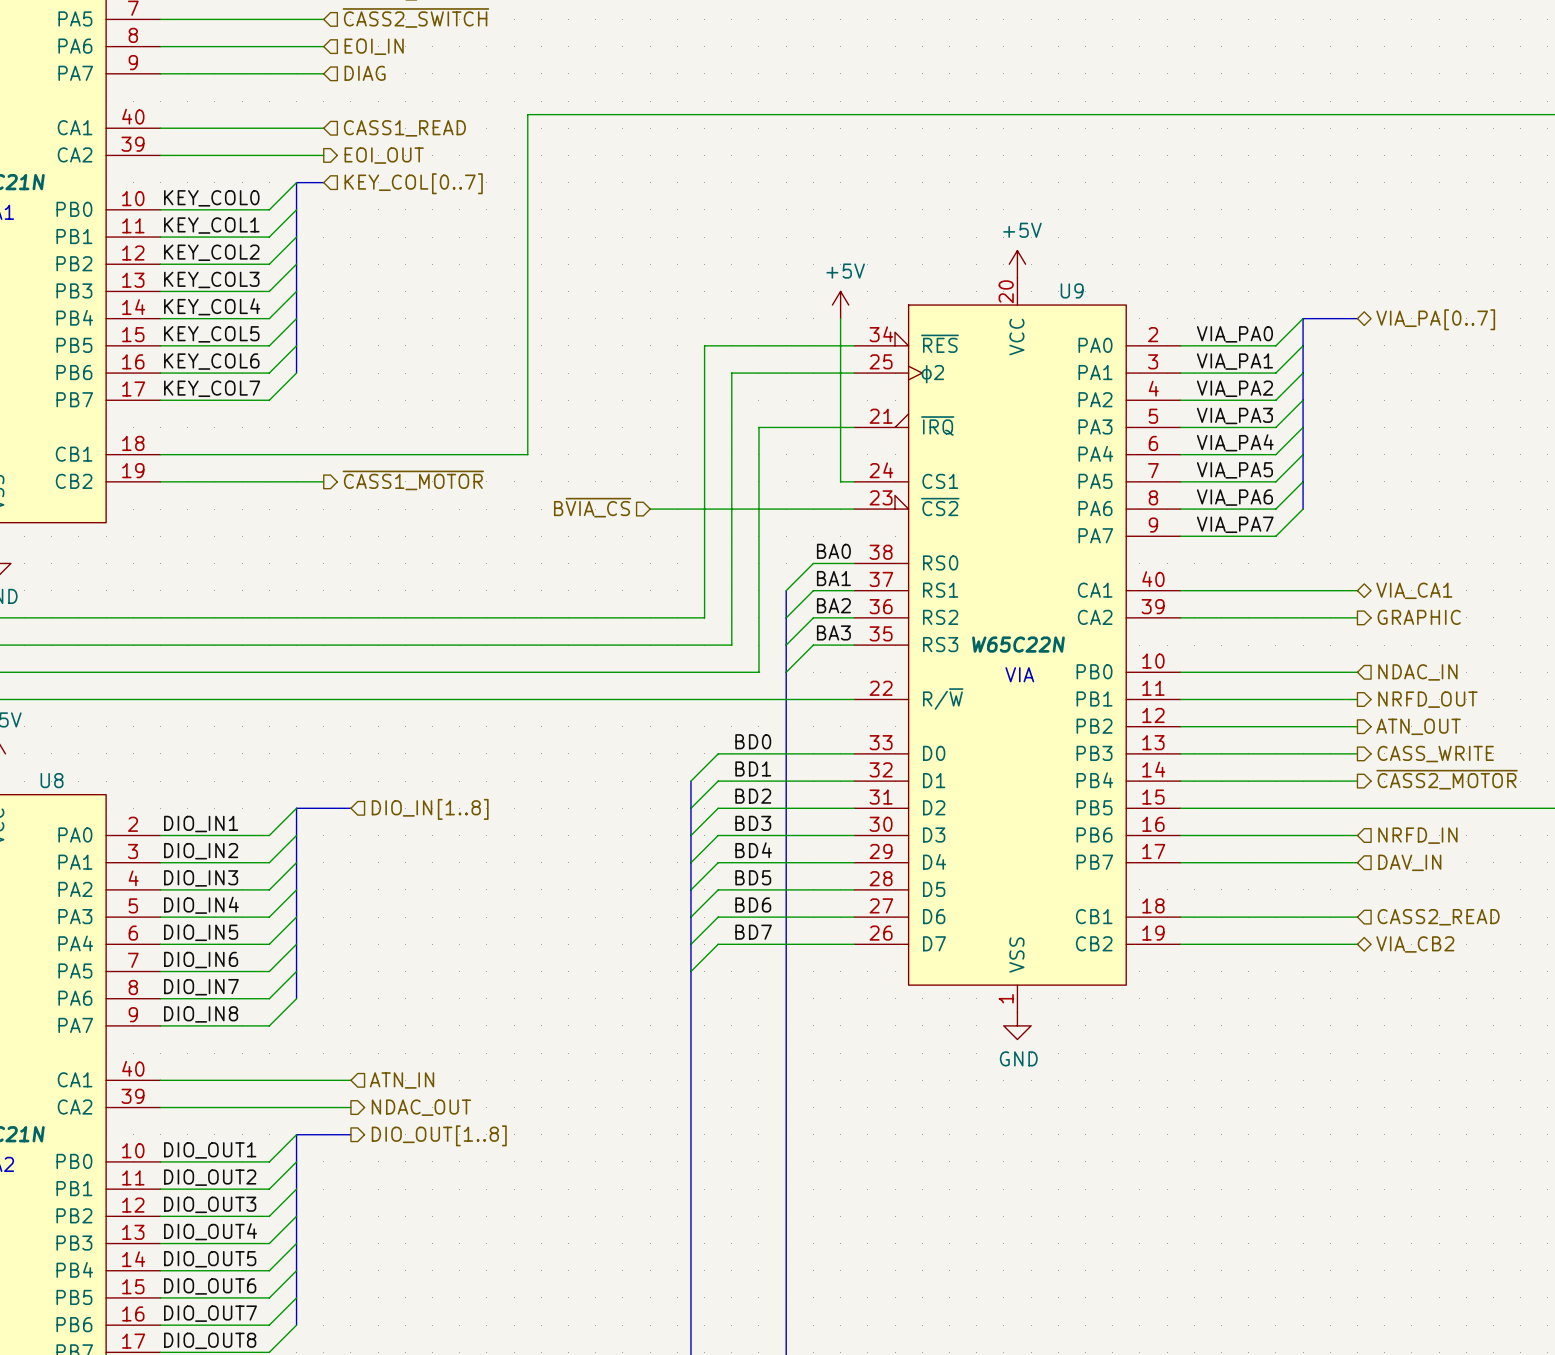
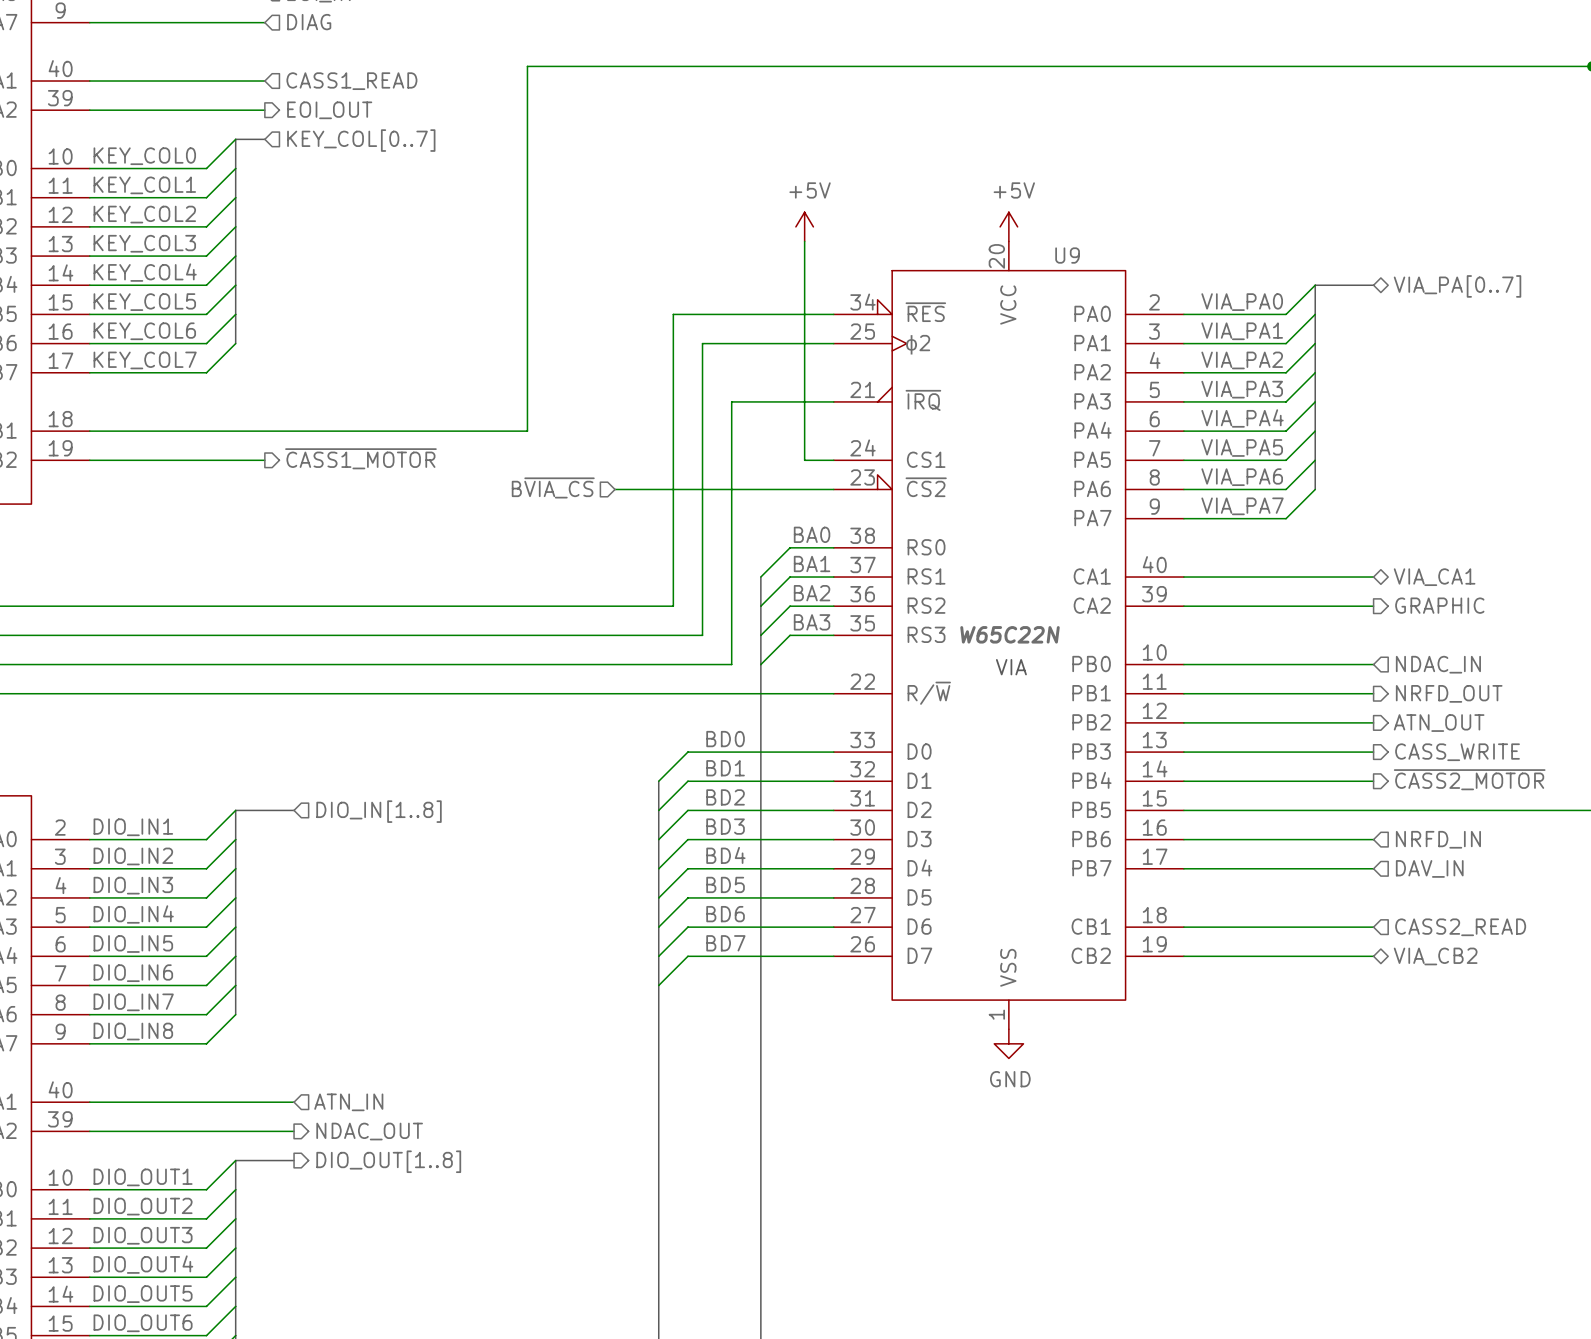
wire: (568, 114) (527, 114) (527, 454) -> (527, 66) (527, 431) (483, 431)
power symbol position: +5V (840, 305) -> +5V (804, 226)
wire: (840, 318) (840, 481) -> (804, 241) (804, 460) (819, 460)

